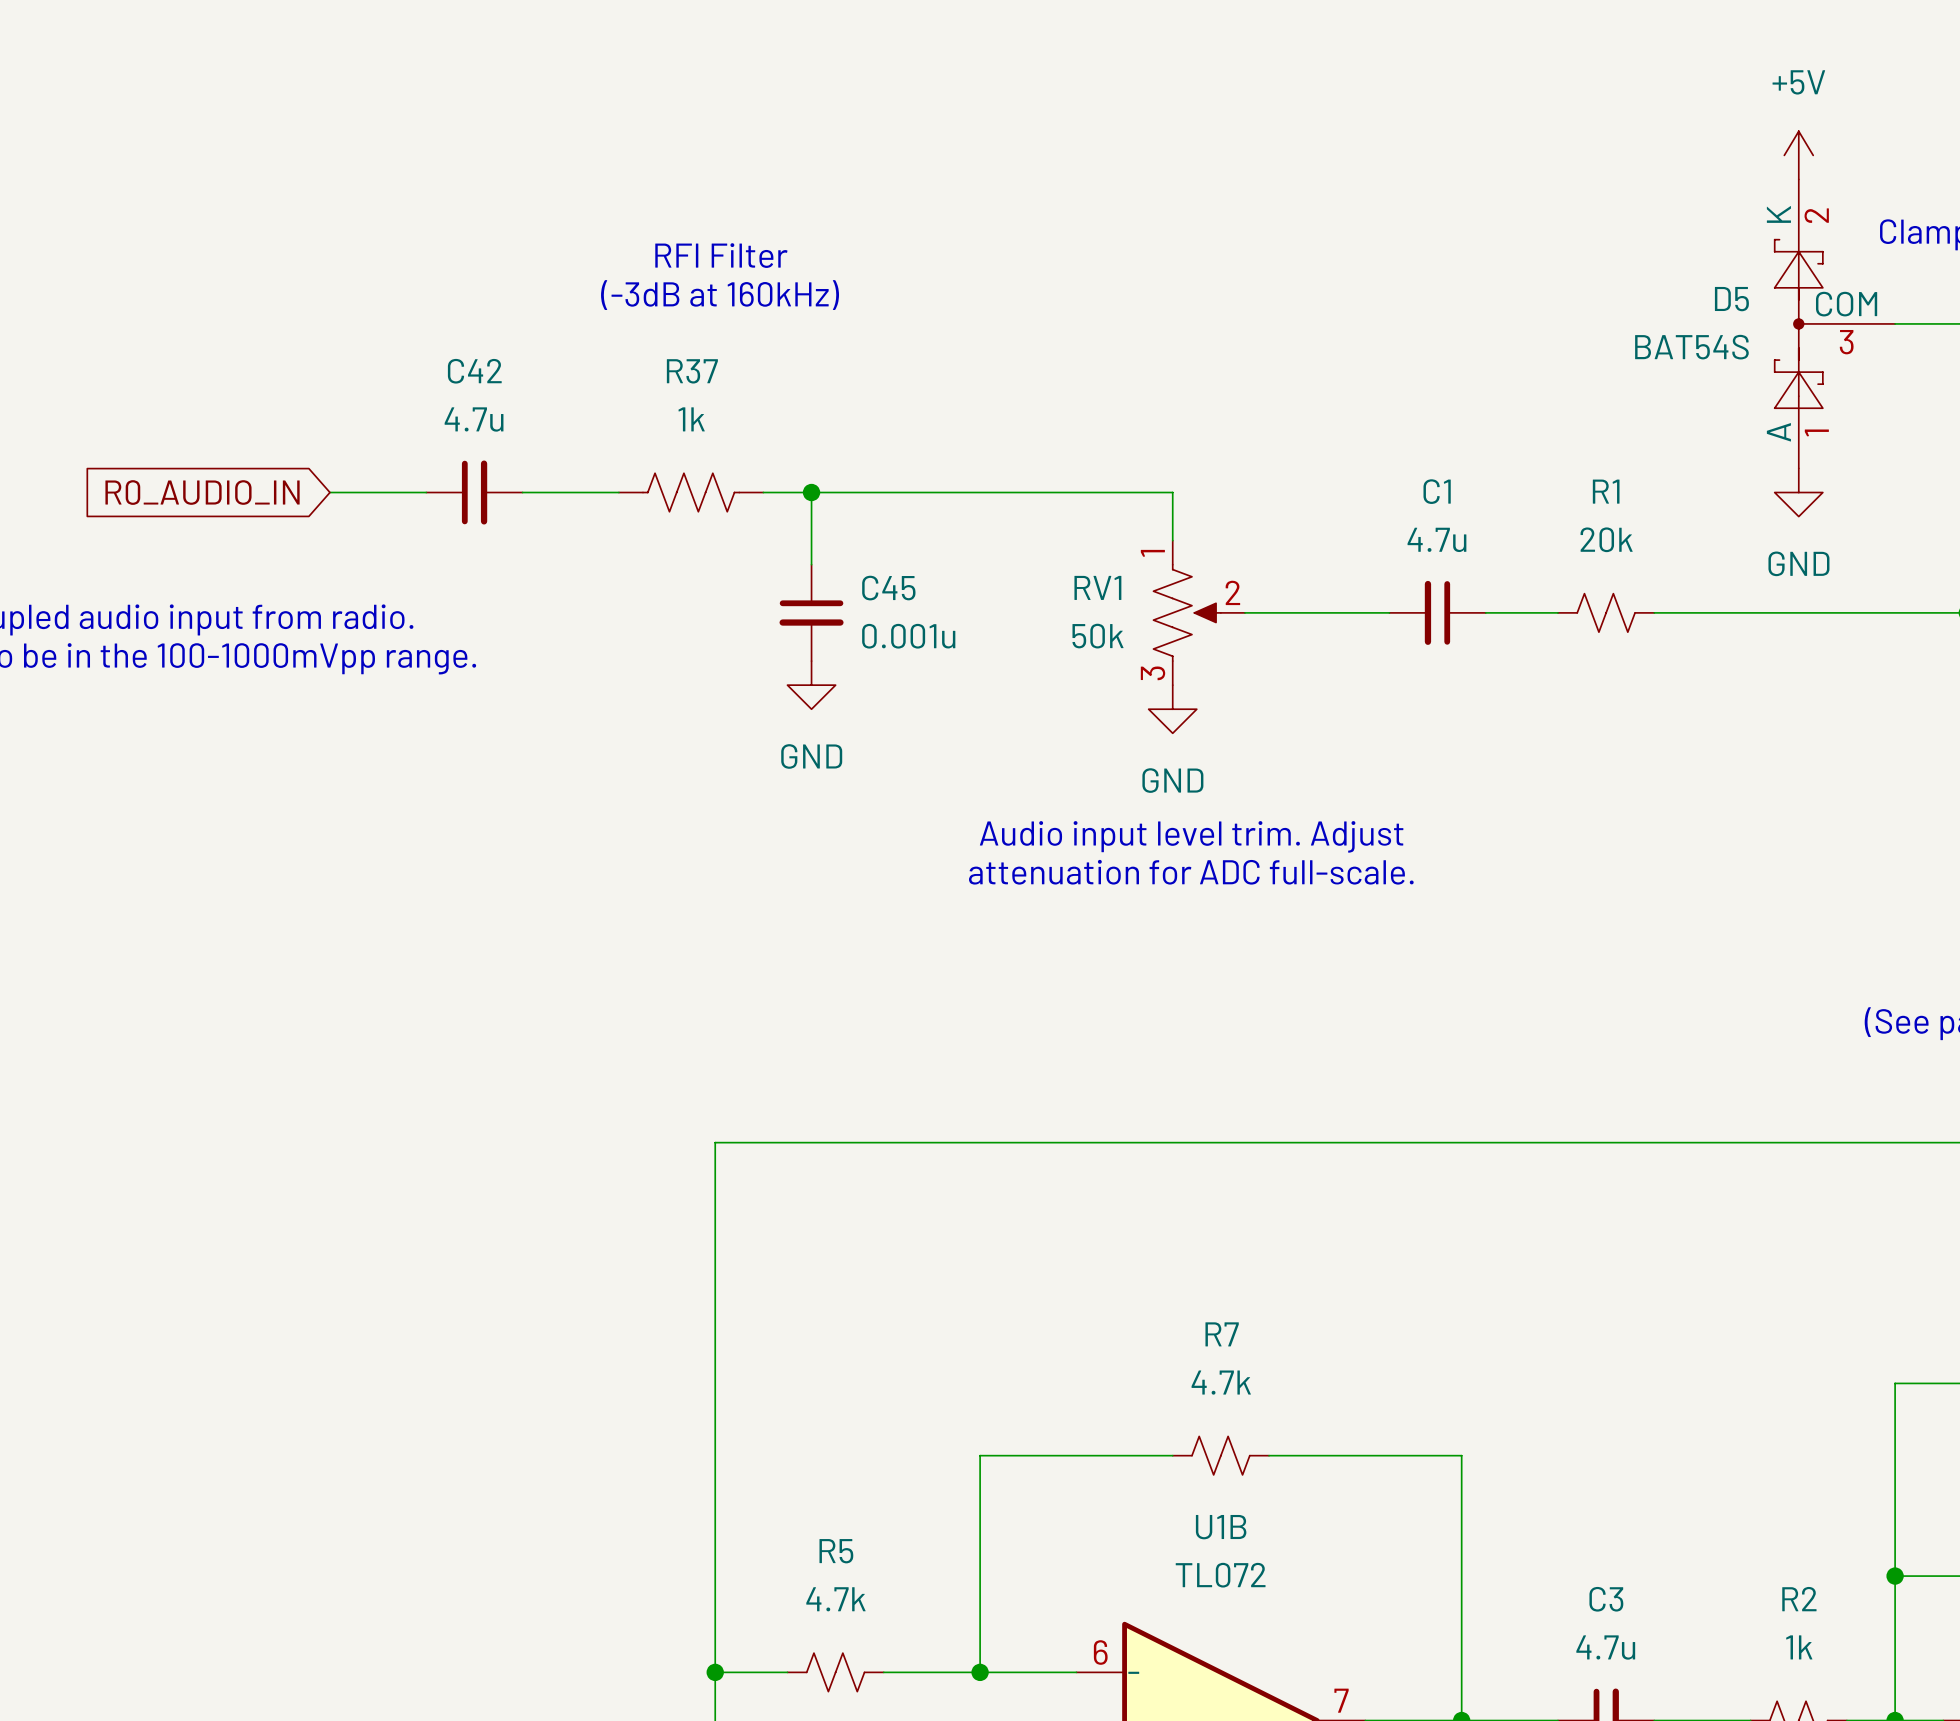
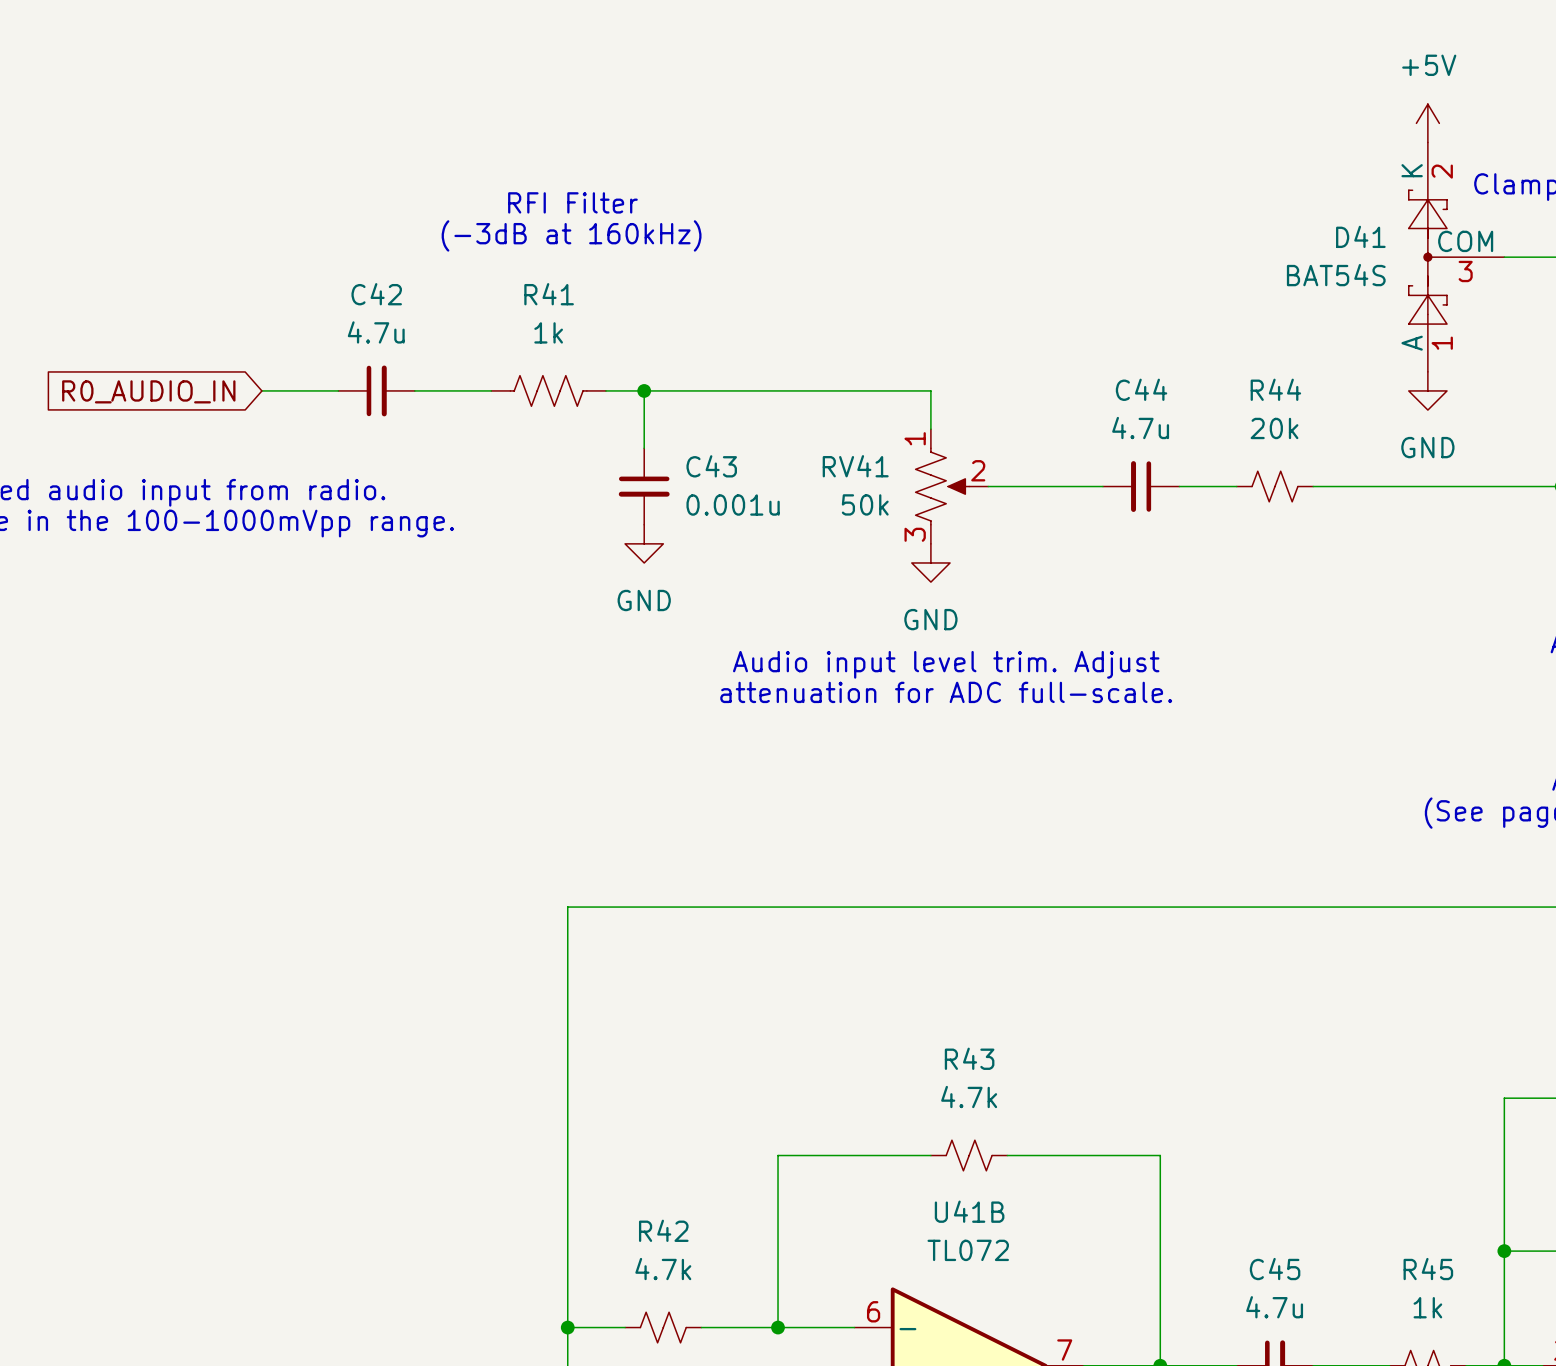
D5 name: D5 (1731, 299) -> D41 (1360, 236)
R37 name: R37 (692, 371) -> R41 (549, 294)
C1 name: C1 (1437, 491) -> C44 (1141, 389)
R1 name: R1 (1606, 491) -> R44 (1275, 389)
RV1 name: RV1 (1097, 587) -> RV41 (855, 466)
C45 name: C45 (888, 588) -> C43 (711, 466)
R7 name: R7 (1222, 1334) -> R43 (969, 1058)
U1B name: U1B (1221, 1527) -> U41B (969, 1211)
R5 name: R5 (836, 1551) -> R42 (663, 1230)
C3 name: C3 (1606, 1599) -> C45 (1275, 1269)
R2 name: R2 (1799, 1599) -> R45 (1428, 1269)

